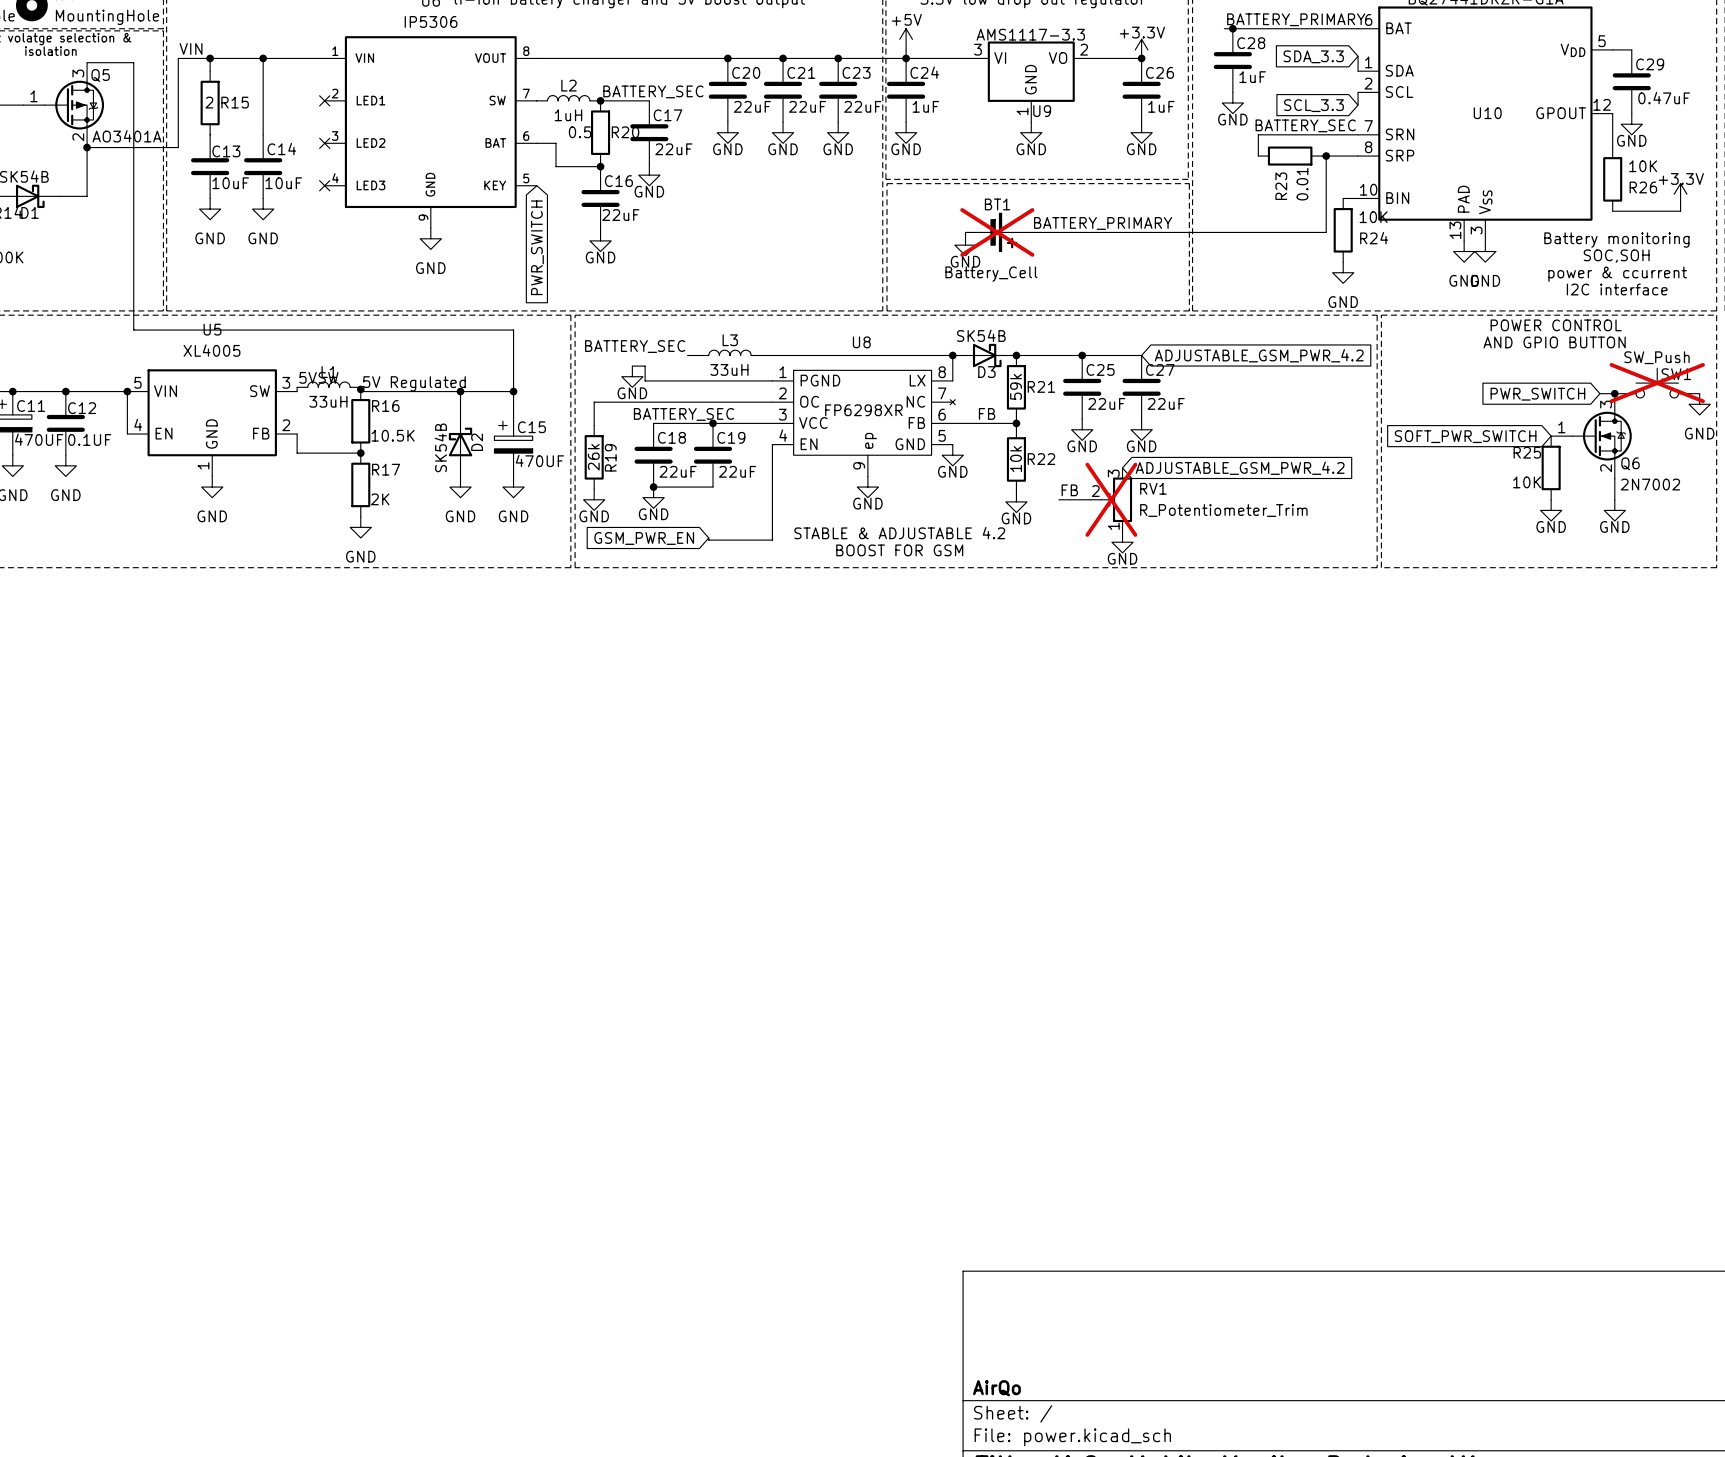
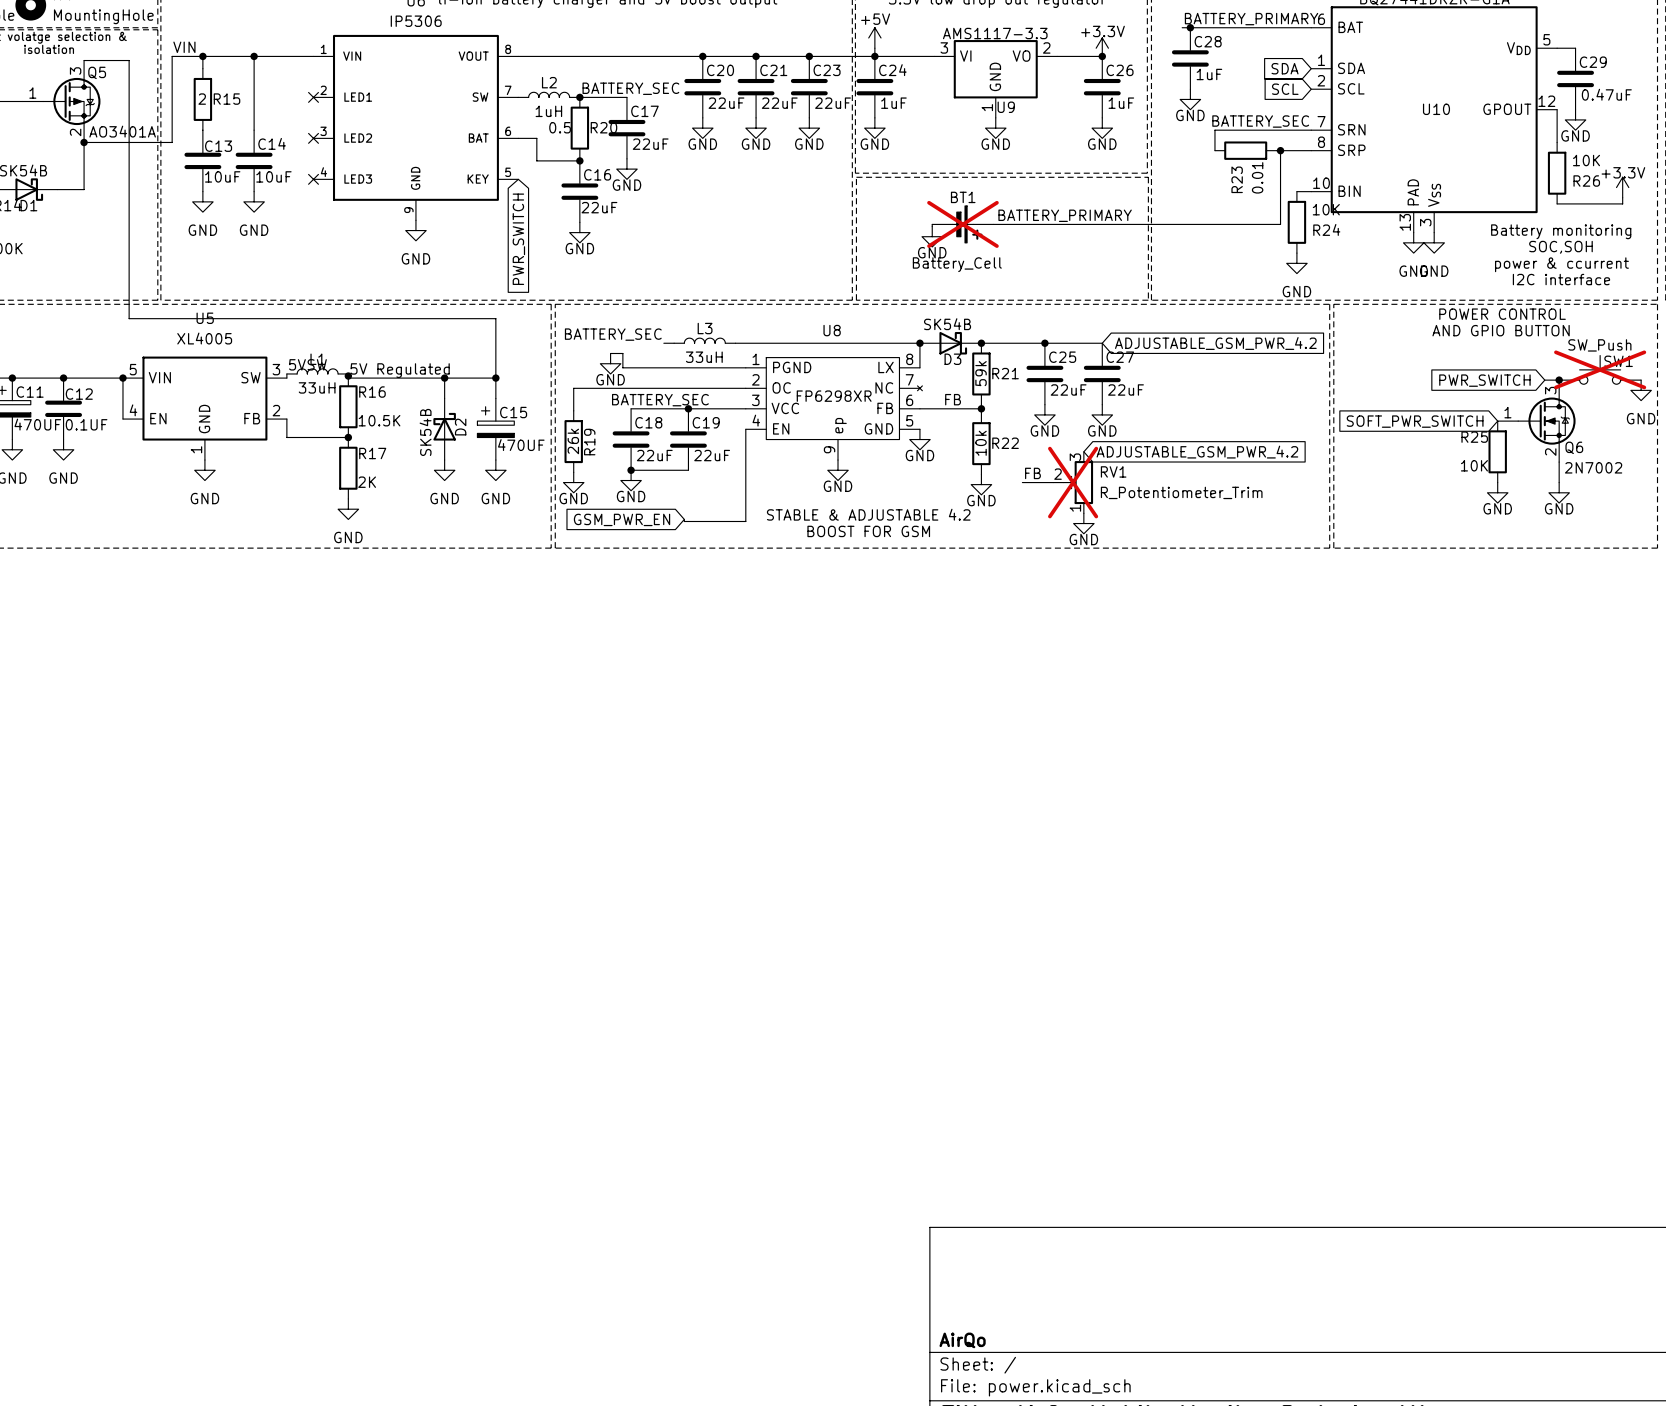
global label: SDA_3.3 (1313, 56) -> none
wire: (1358, 56) (1358, 71) -> none
global label: none -> SDA (1285, 68)
global label: none -> SCL (1285, 89)
wire: (1358, 92) (1358, 105) -> none
global label: SCL_3.3 (1313, 105) -> none

